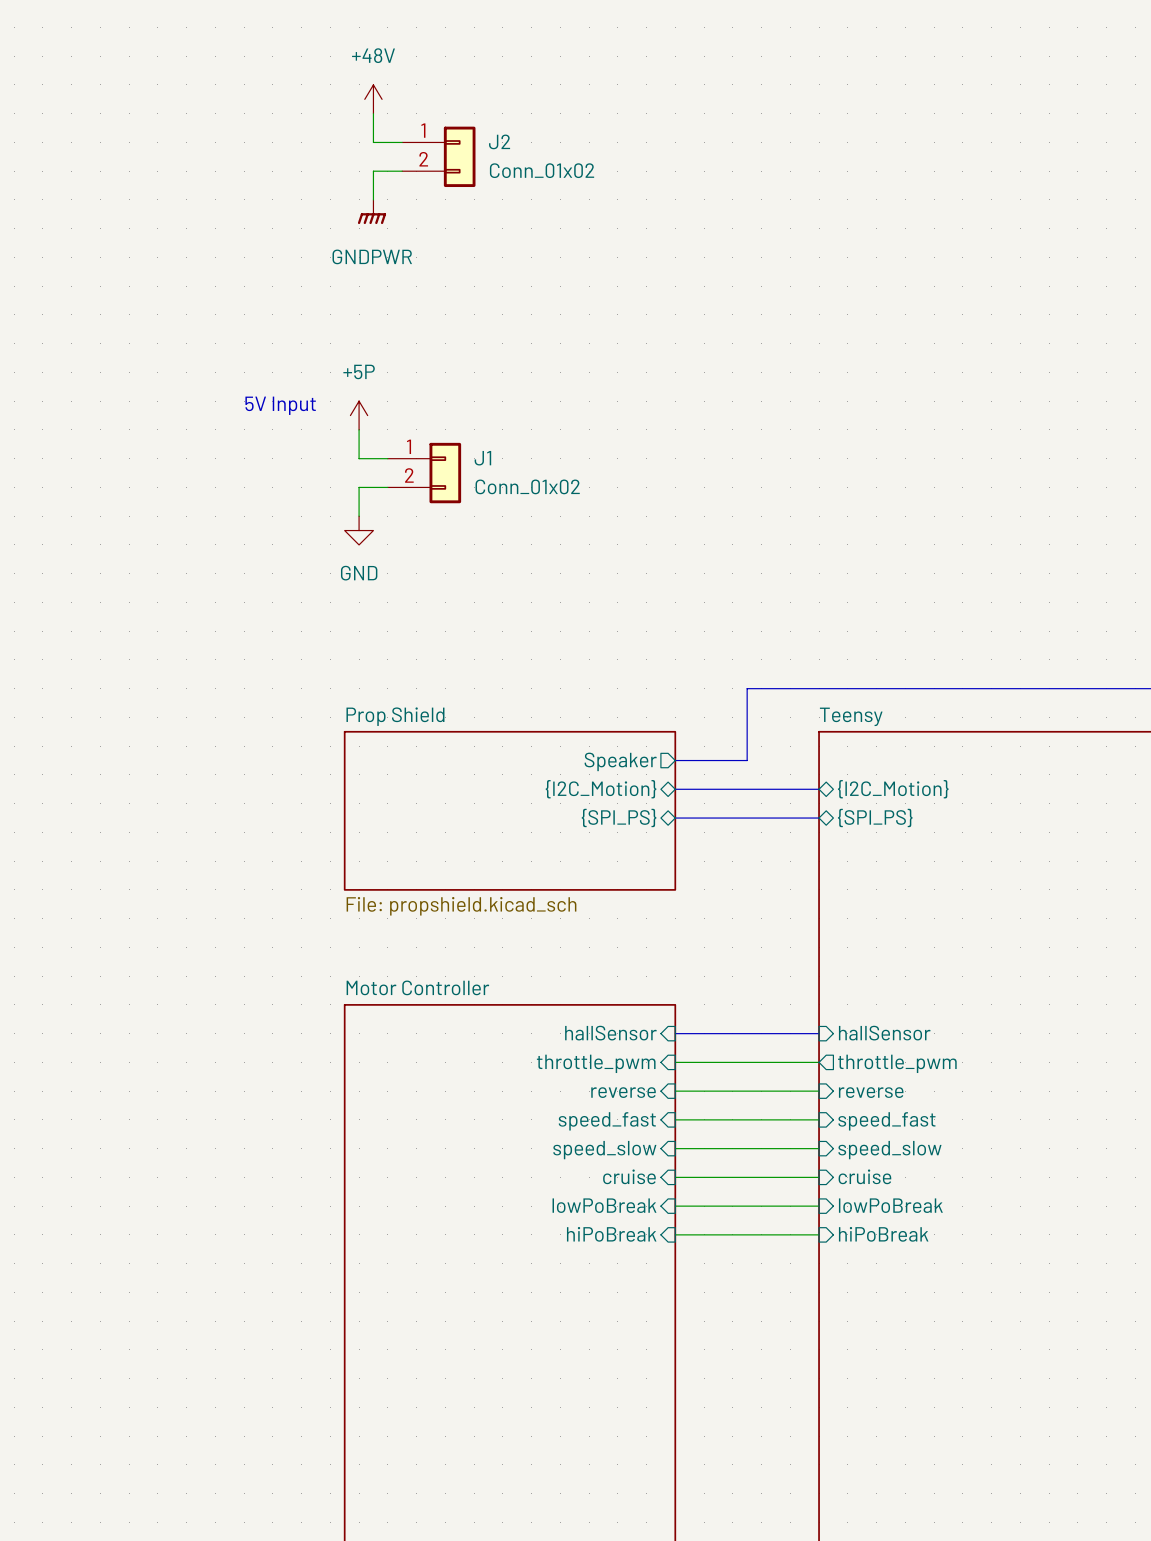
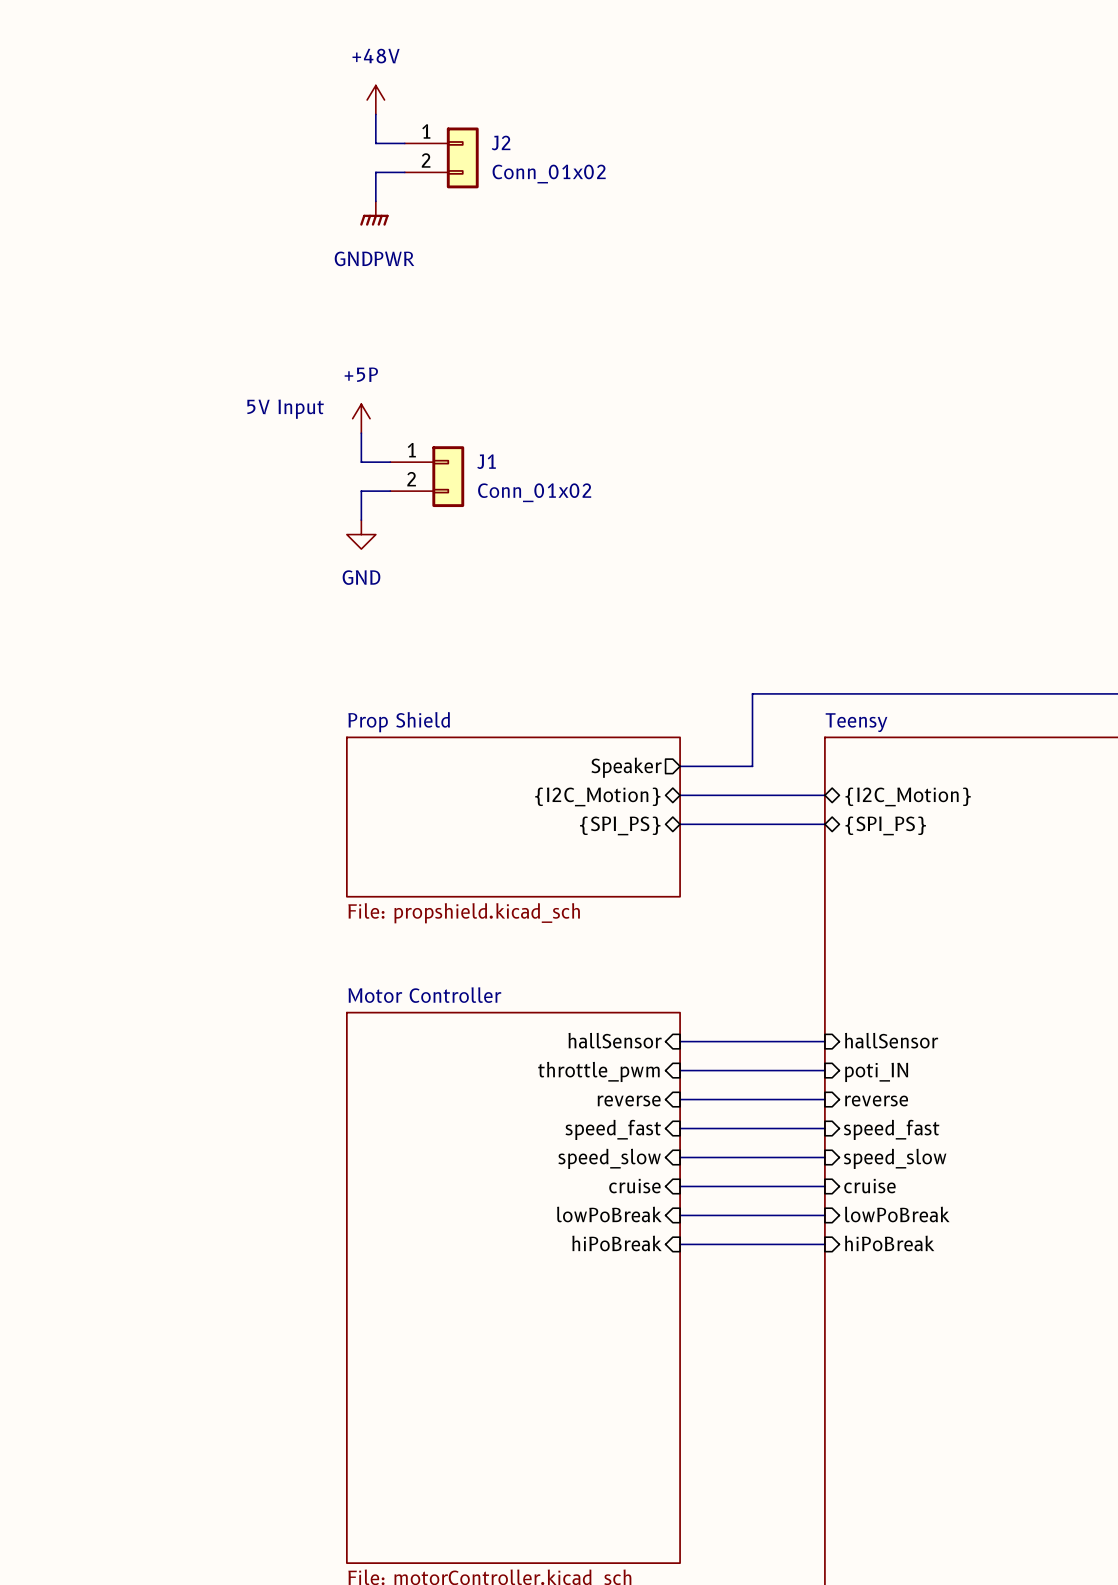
sheet pin shape: output (897, 1063) -> input (876, 1072)
sheet pin: throttle_pwm (897, 1063) -> poti_IN (876, 1072)

